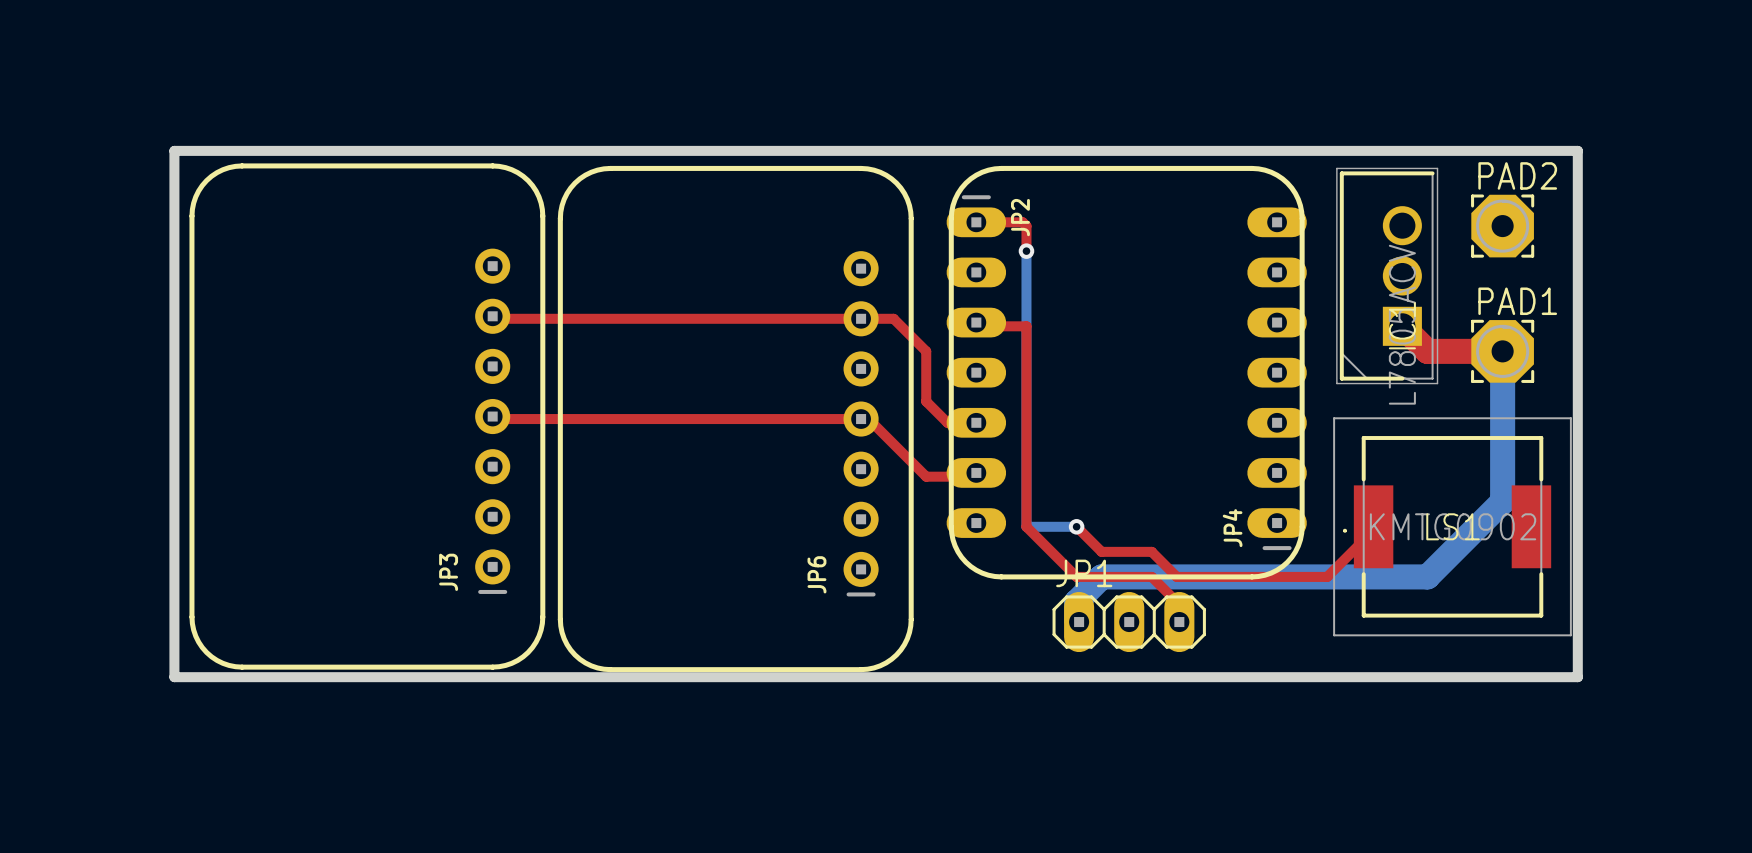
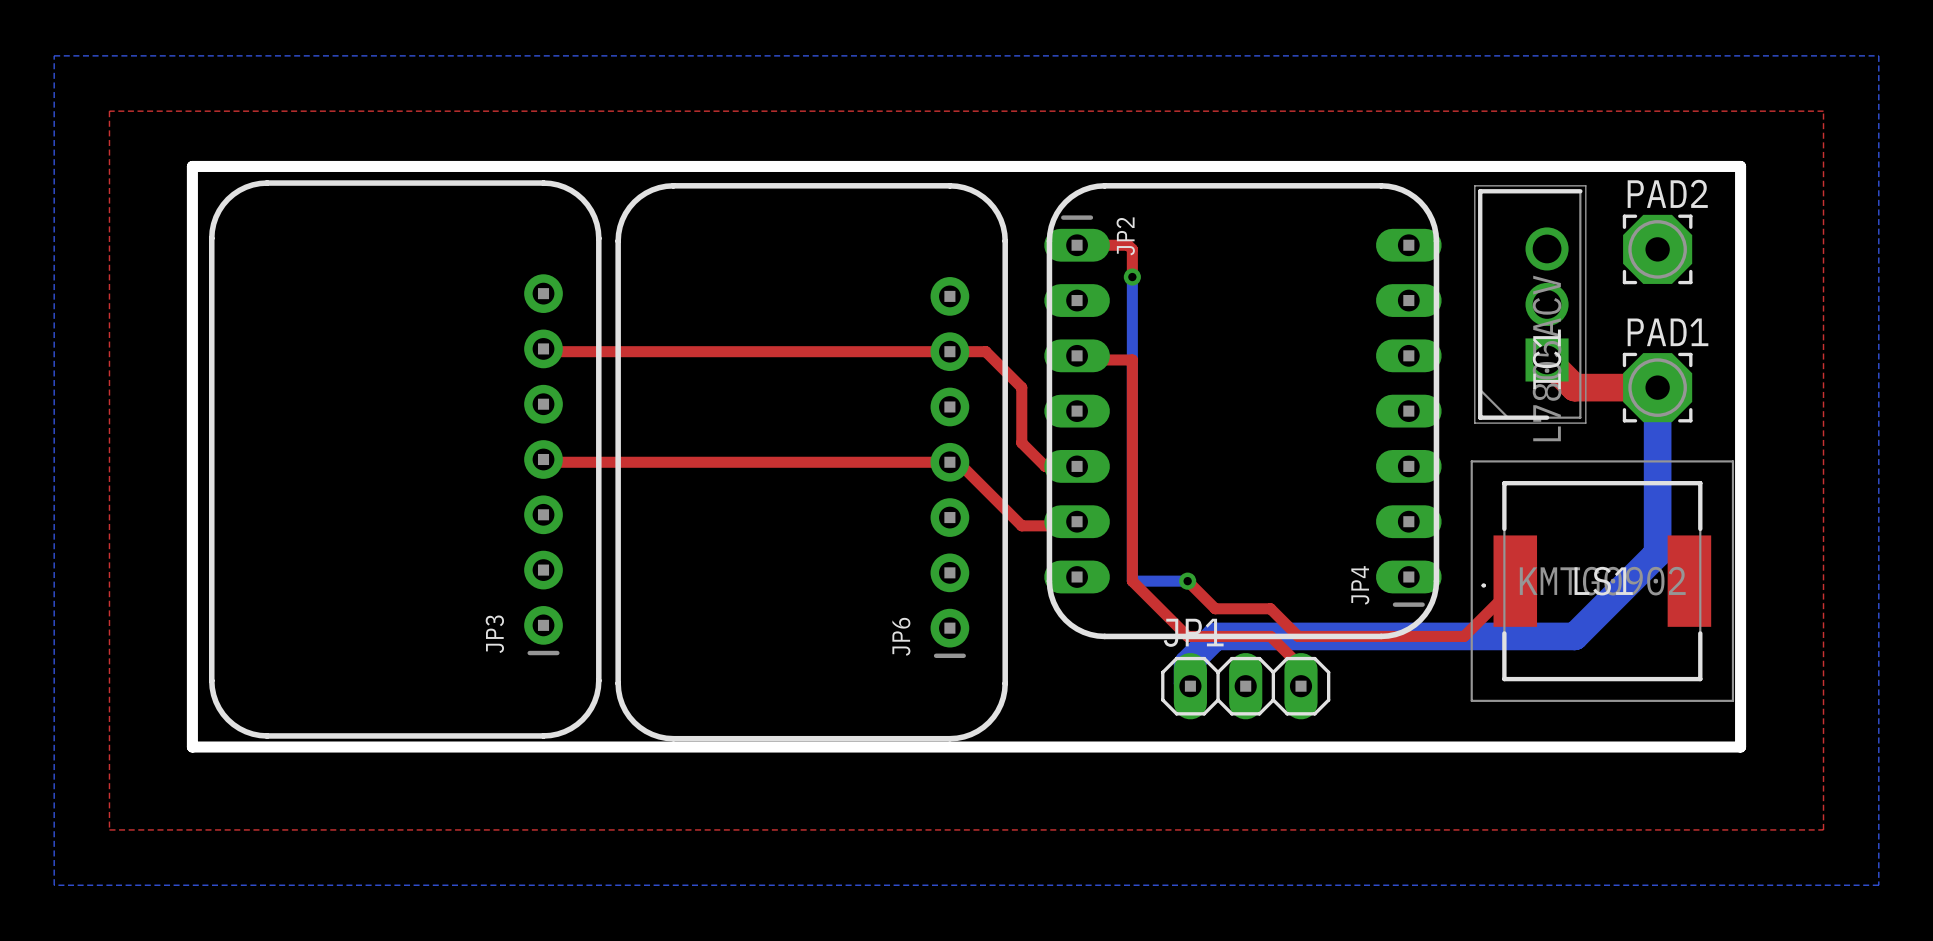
bottom zone outline: none -> (54, 55) (1878, 55) (1878, 885) (54, 885) (54, 55)
top zone outline: none -> (109, 111) (109, 829) (1823, 829) (1823, 111) (109, 111)

